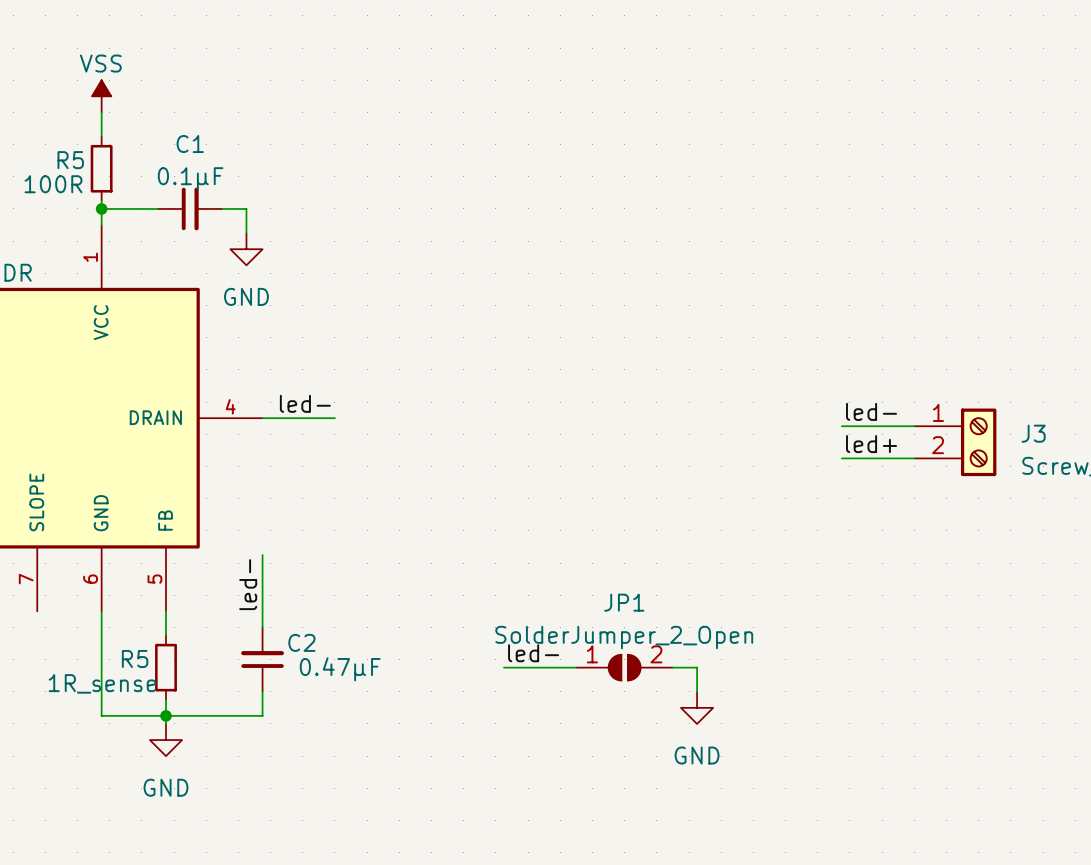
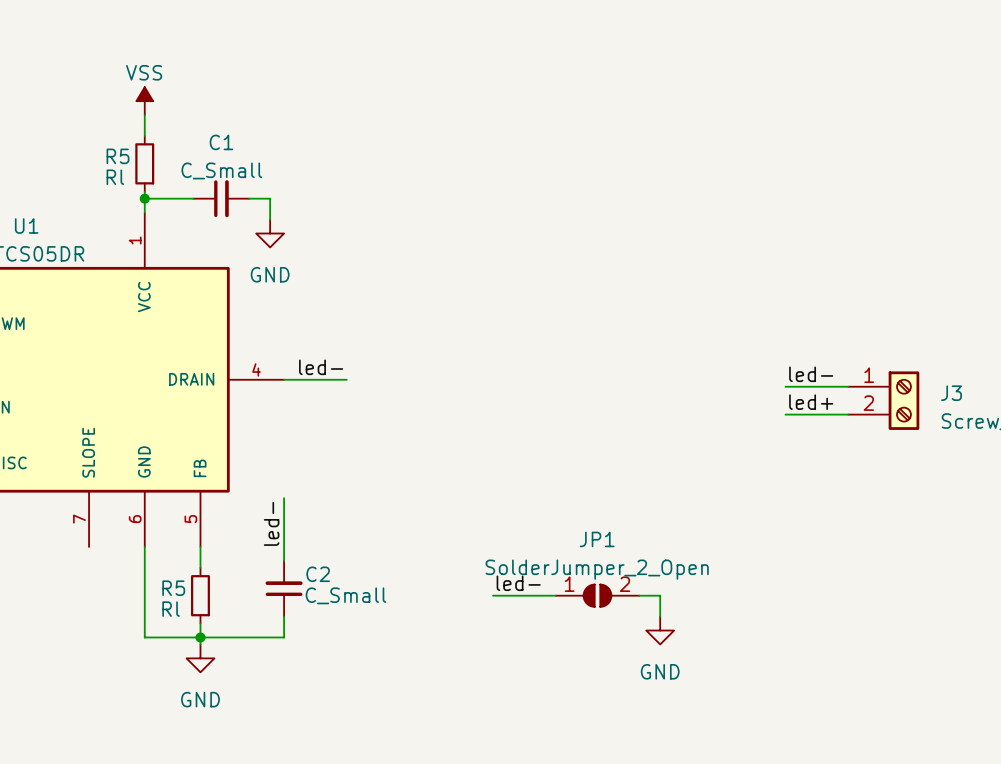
C1 value: 0.1µF (190, 178) -> C_Small (221, 170)
R5 value: 100R (53, 184) -> Rl (115, 177)
C2 value: 0.47µF (340, 669) -> C_Small (345, 595)
R5 value: 1R_sense (102, 683) -> Rl (171, 609)

